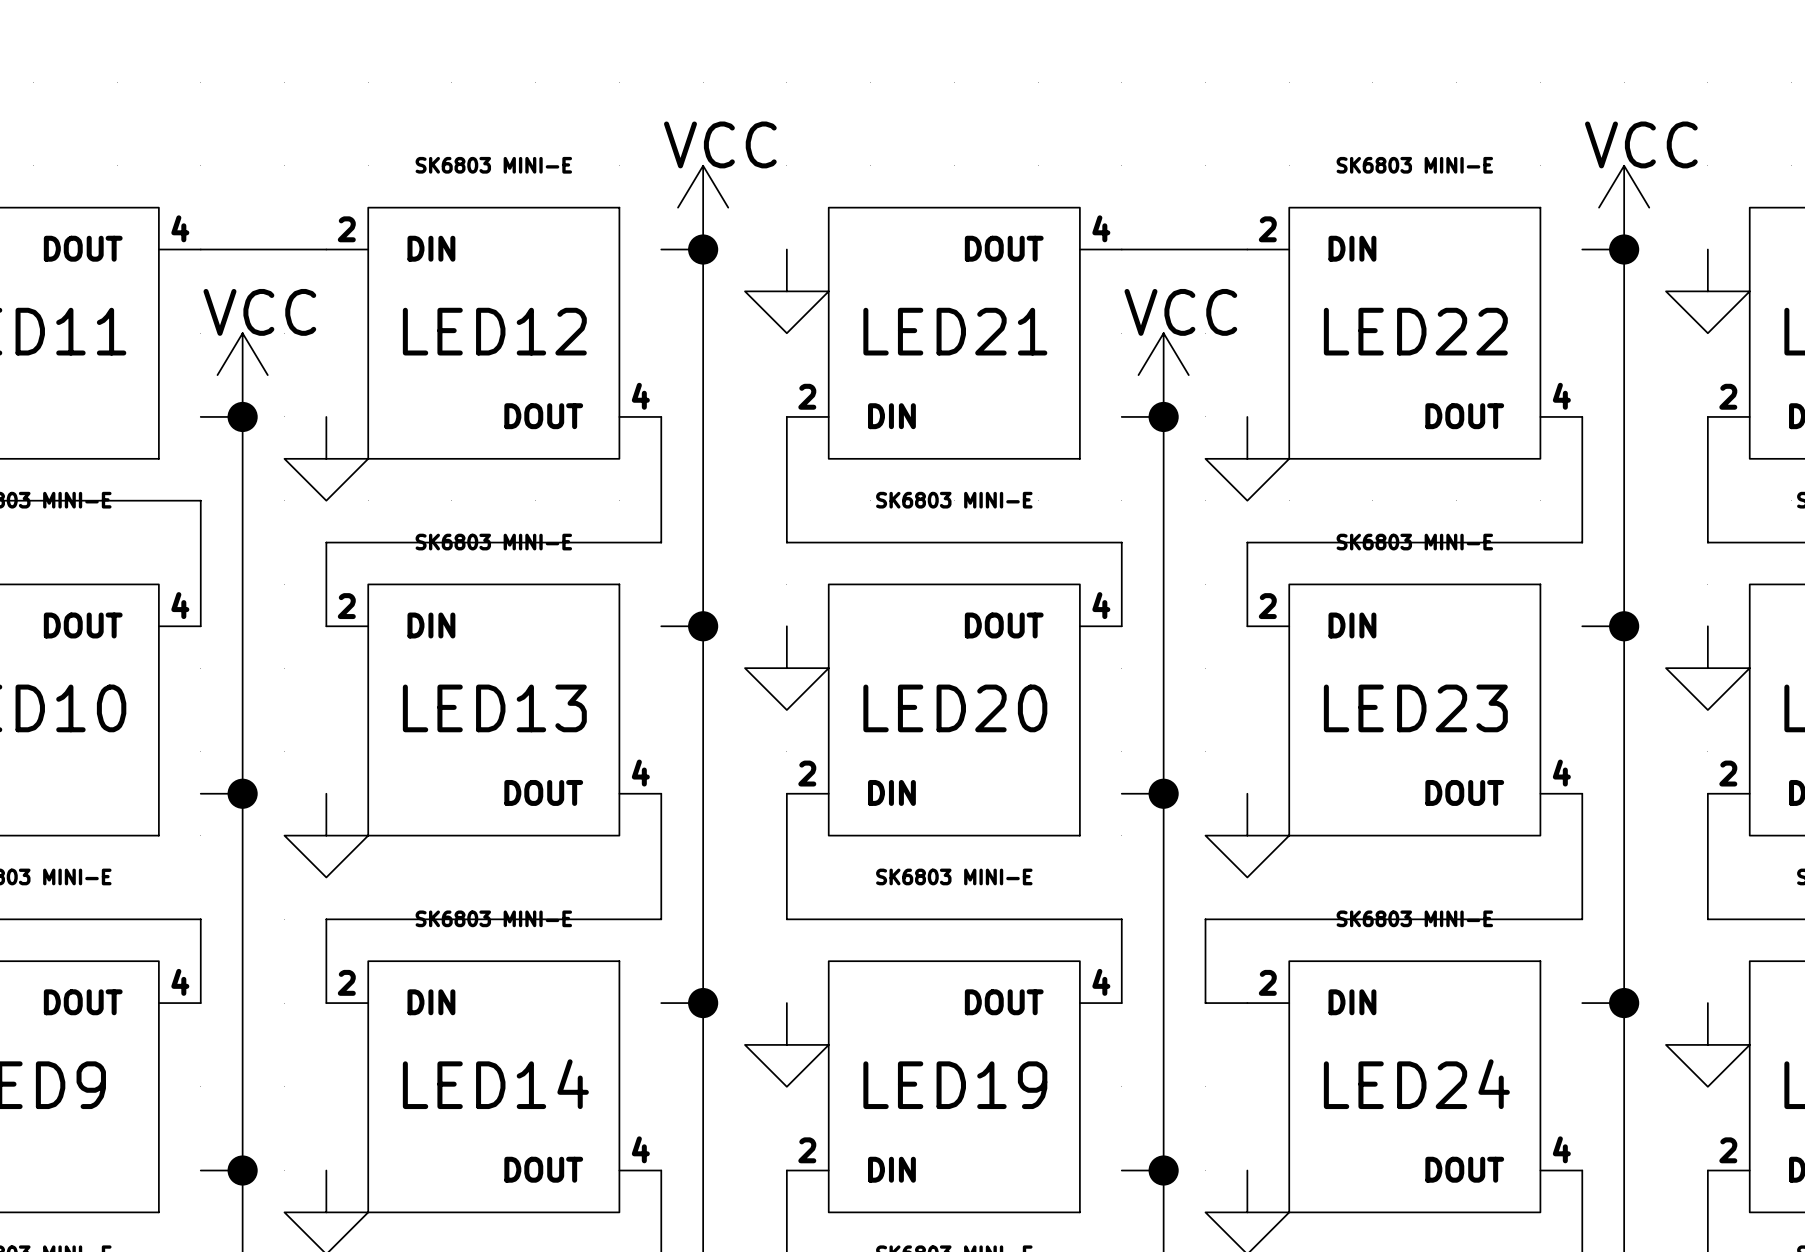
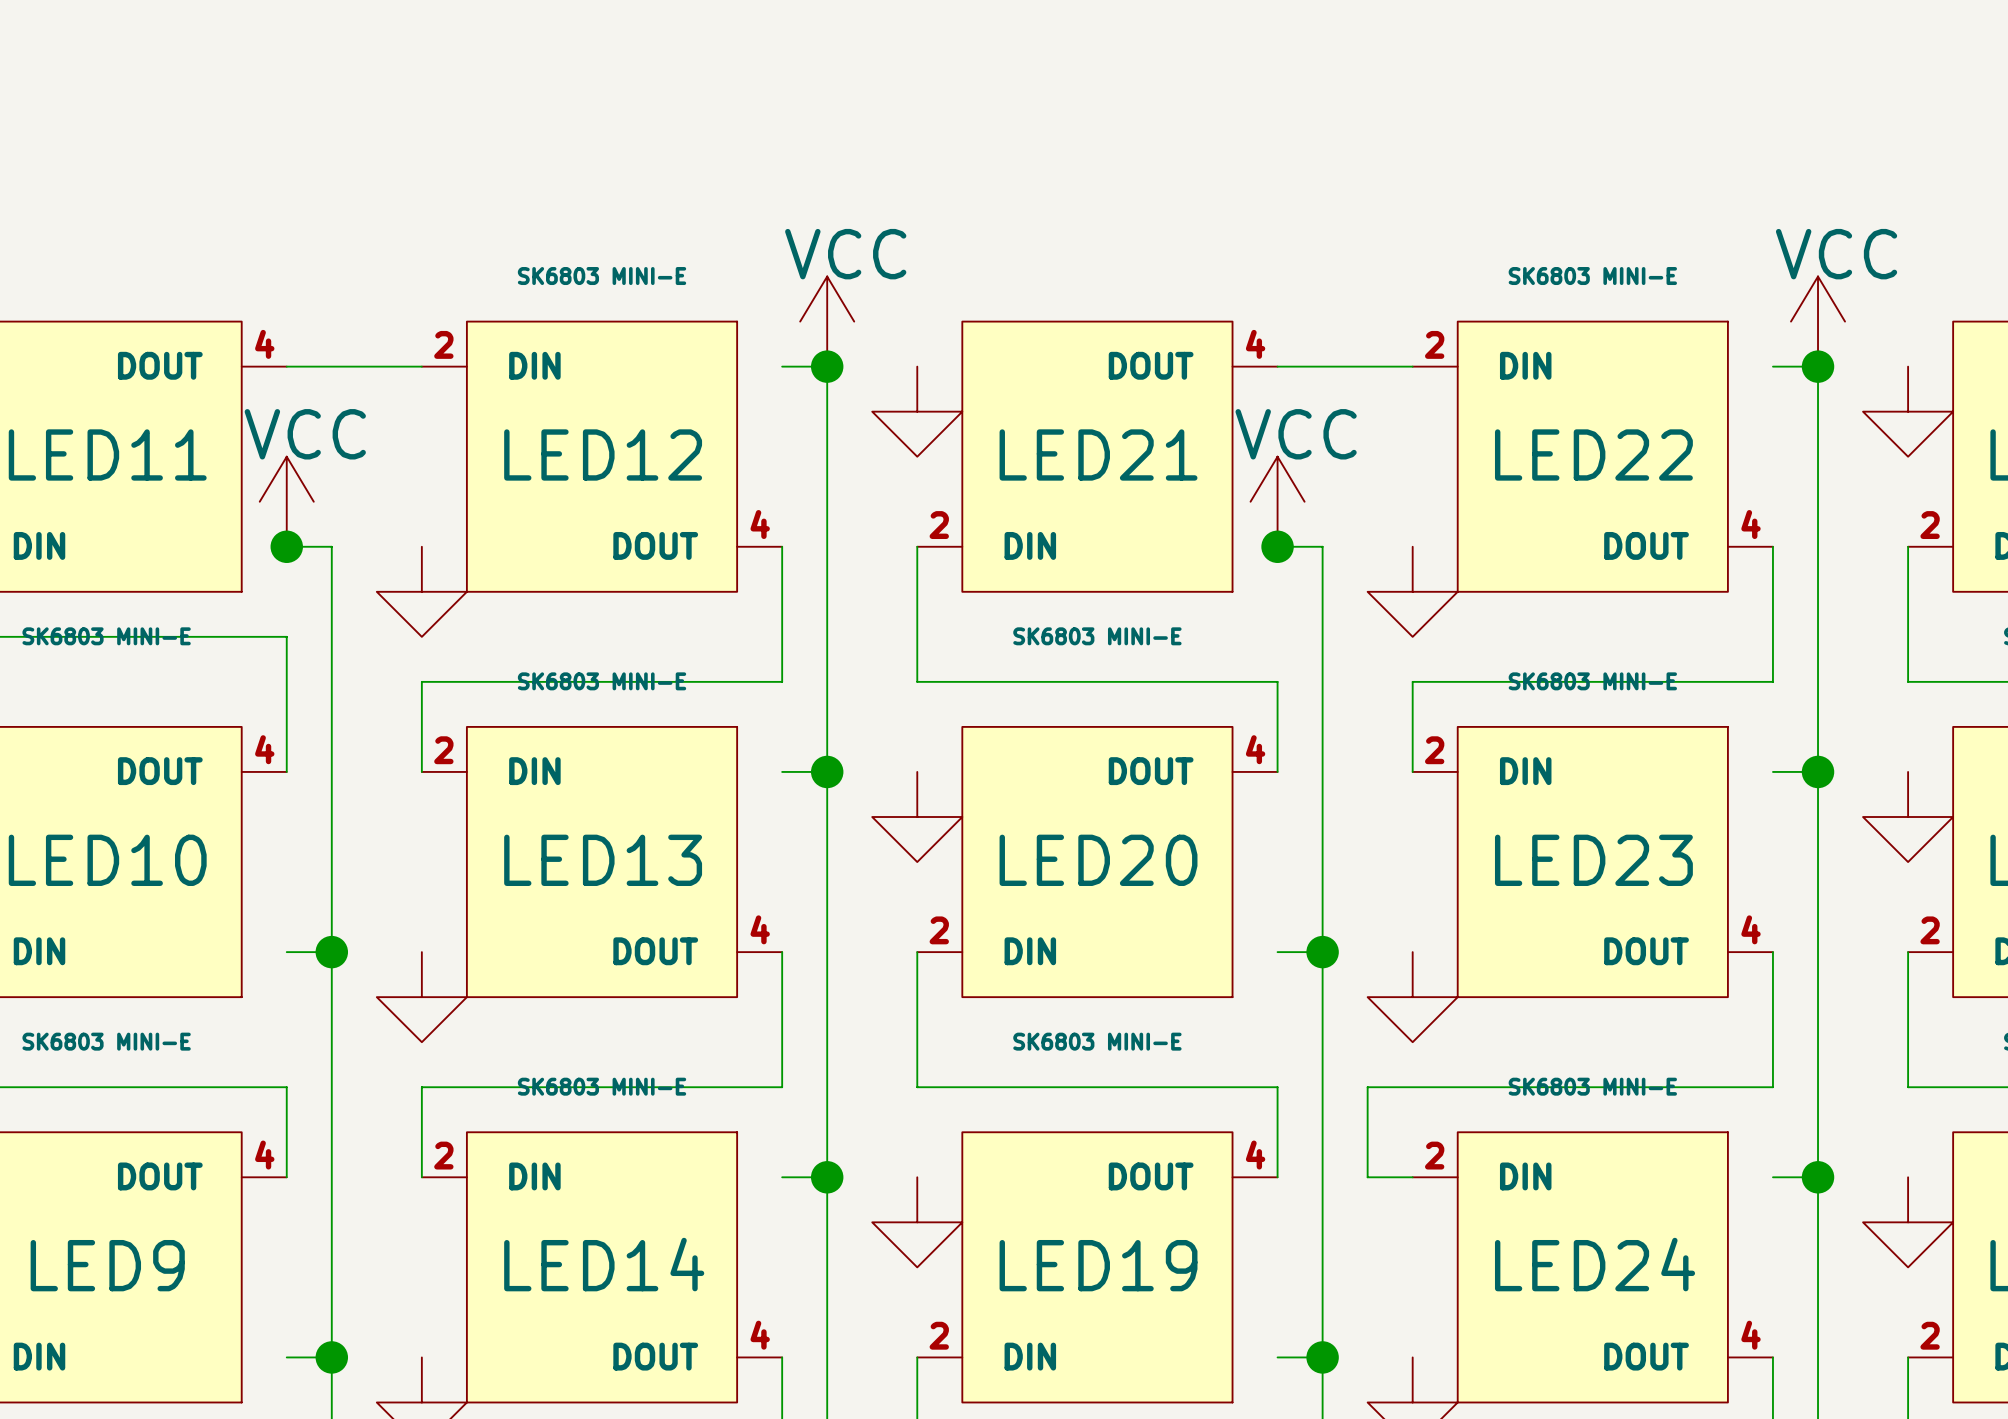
power symbol position: VCC (242, 375) -> VCC (286, 501)
power symbol position: VCC (1163, 375) -> VCC (1277, 501)
junction position: (242, 416) -> (286, 546)
junction position: (1163, 416) -> (1277, 546)

